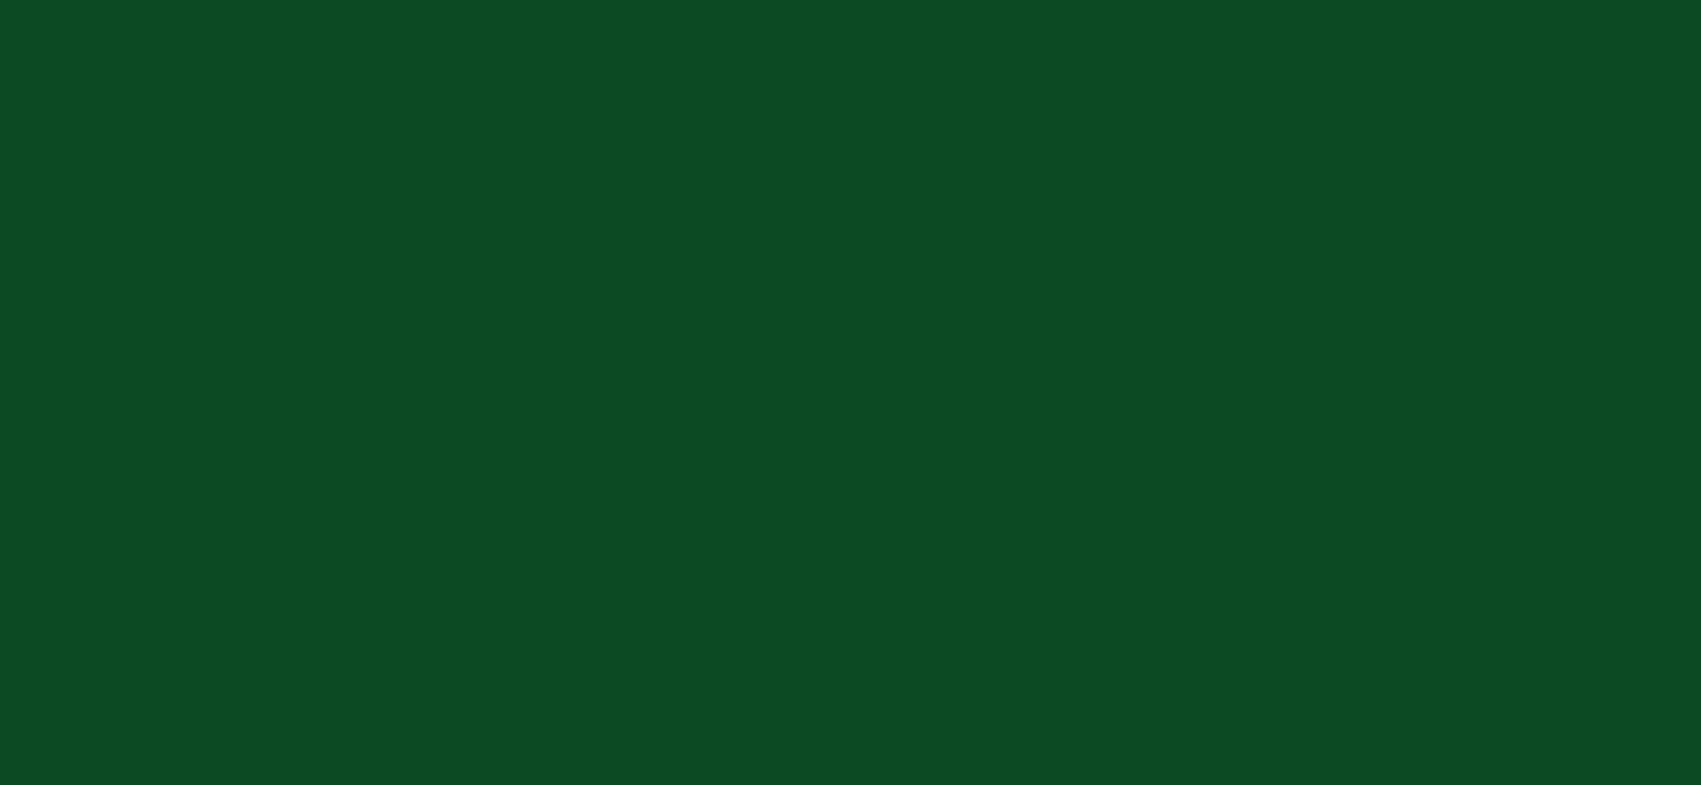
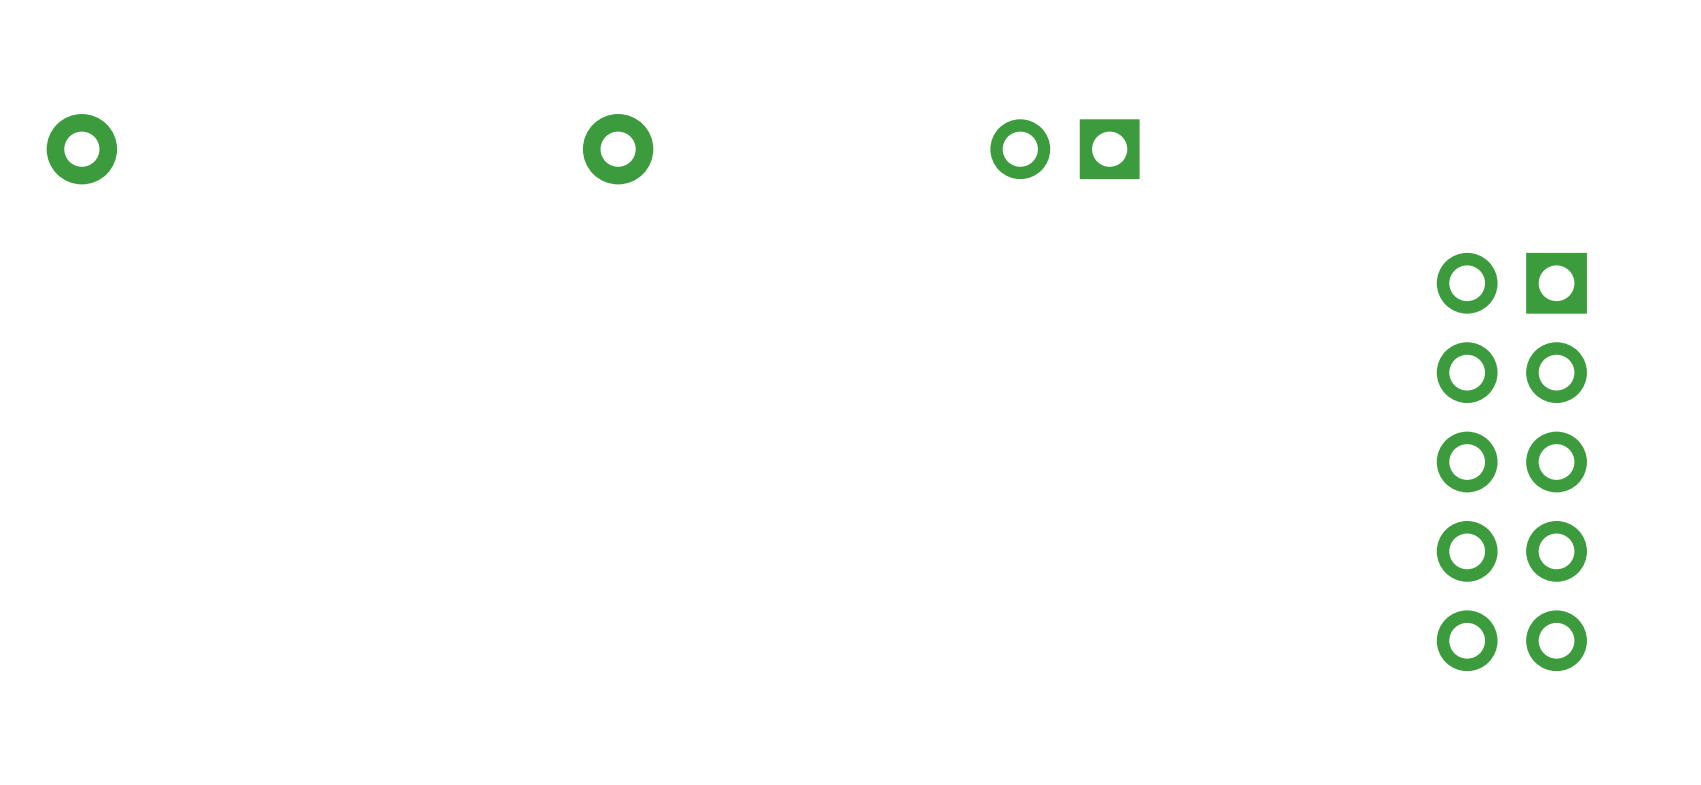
part: none -> (81, 149)
part: none -> (618, 149)
part: none -> (1064, 149)
part: none -> (1511, 462)

